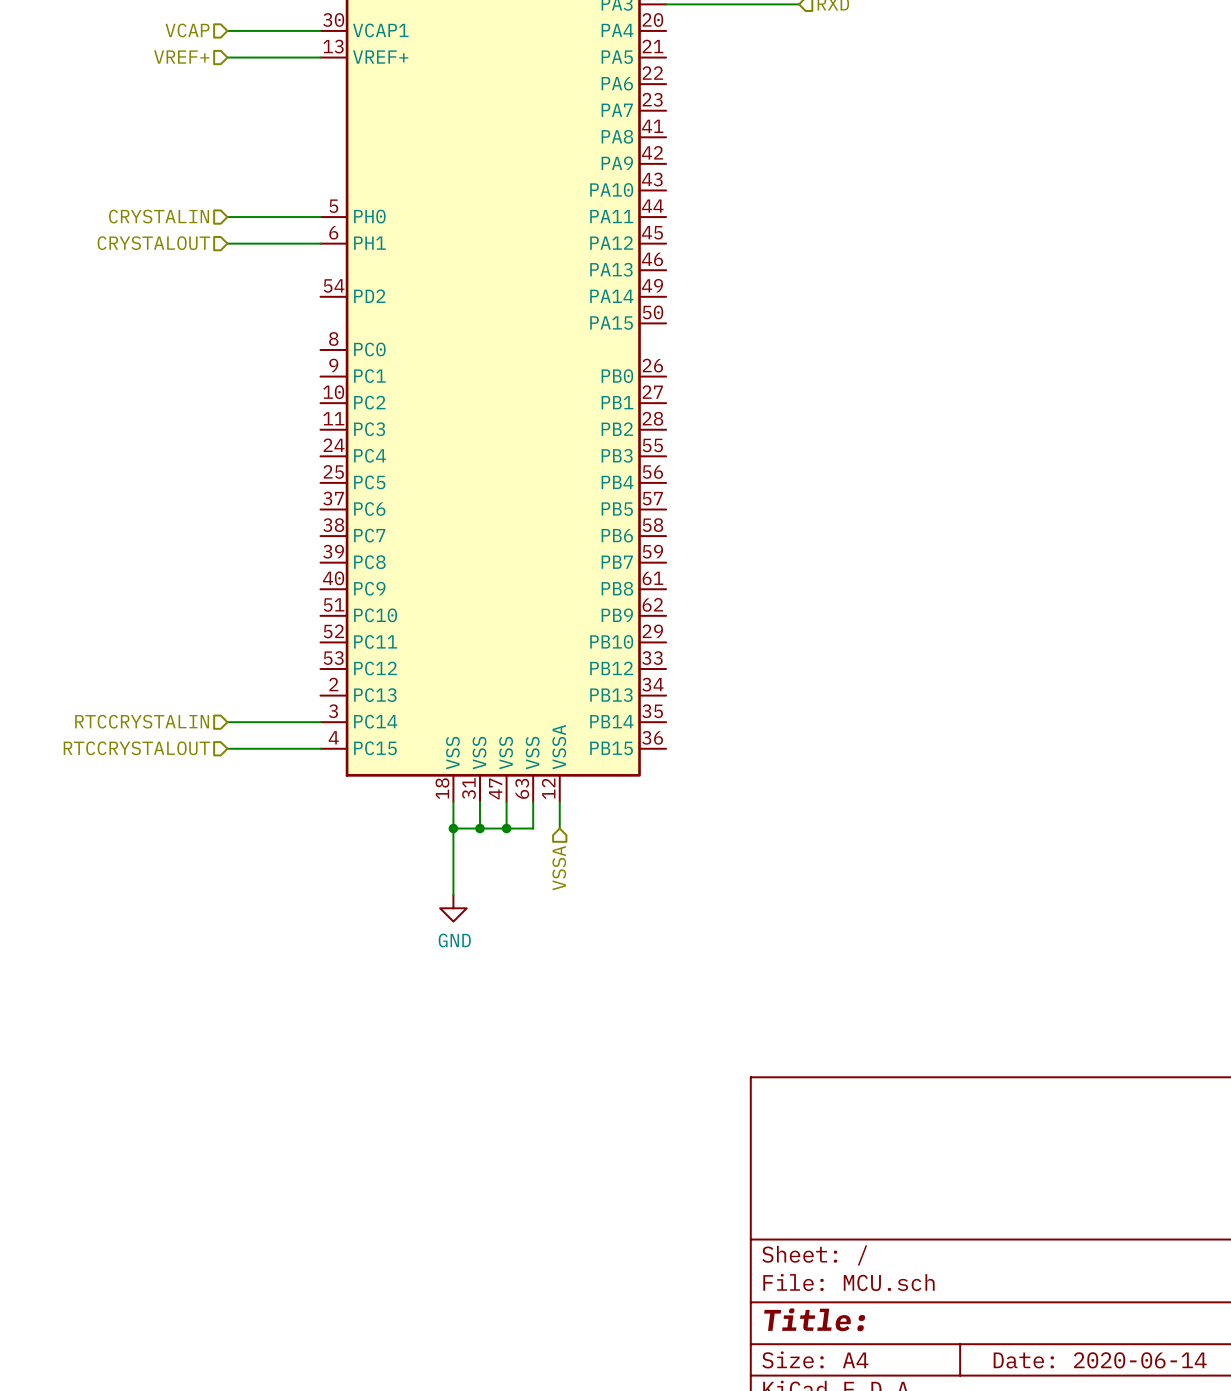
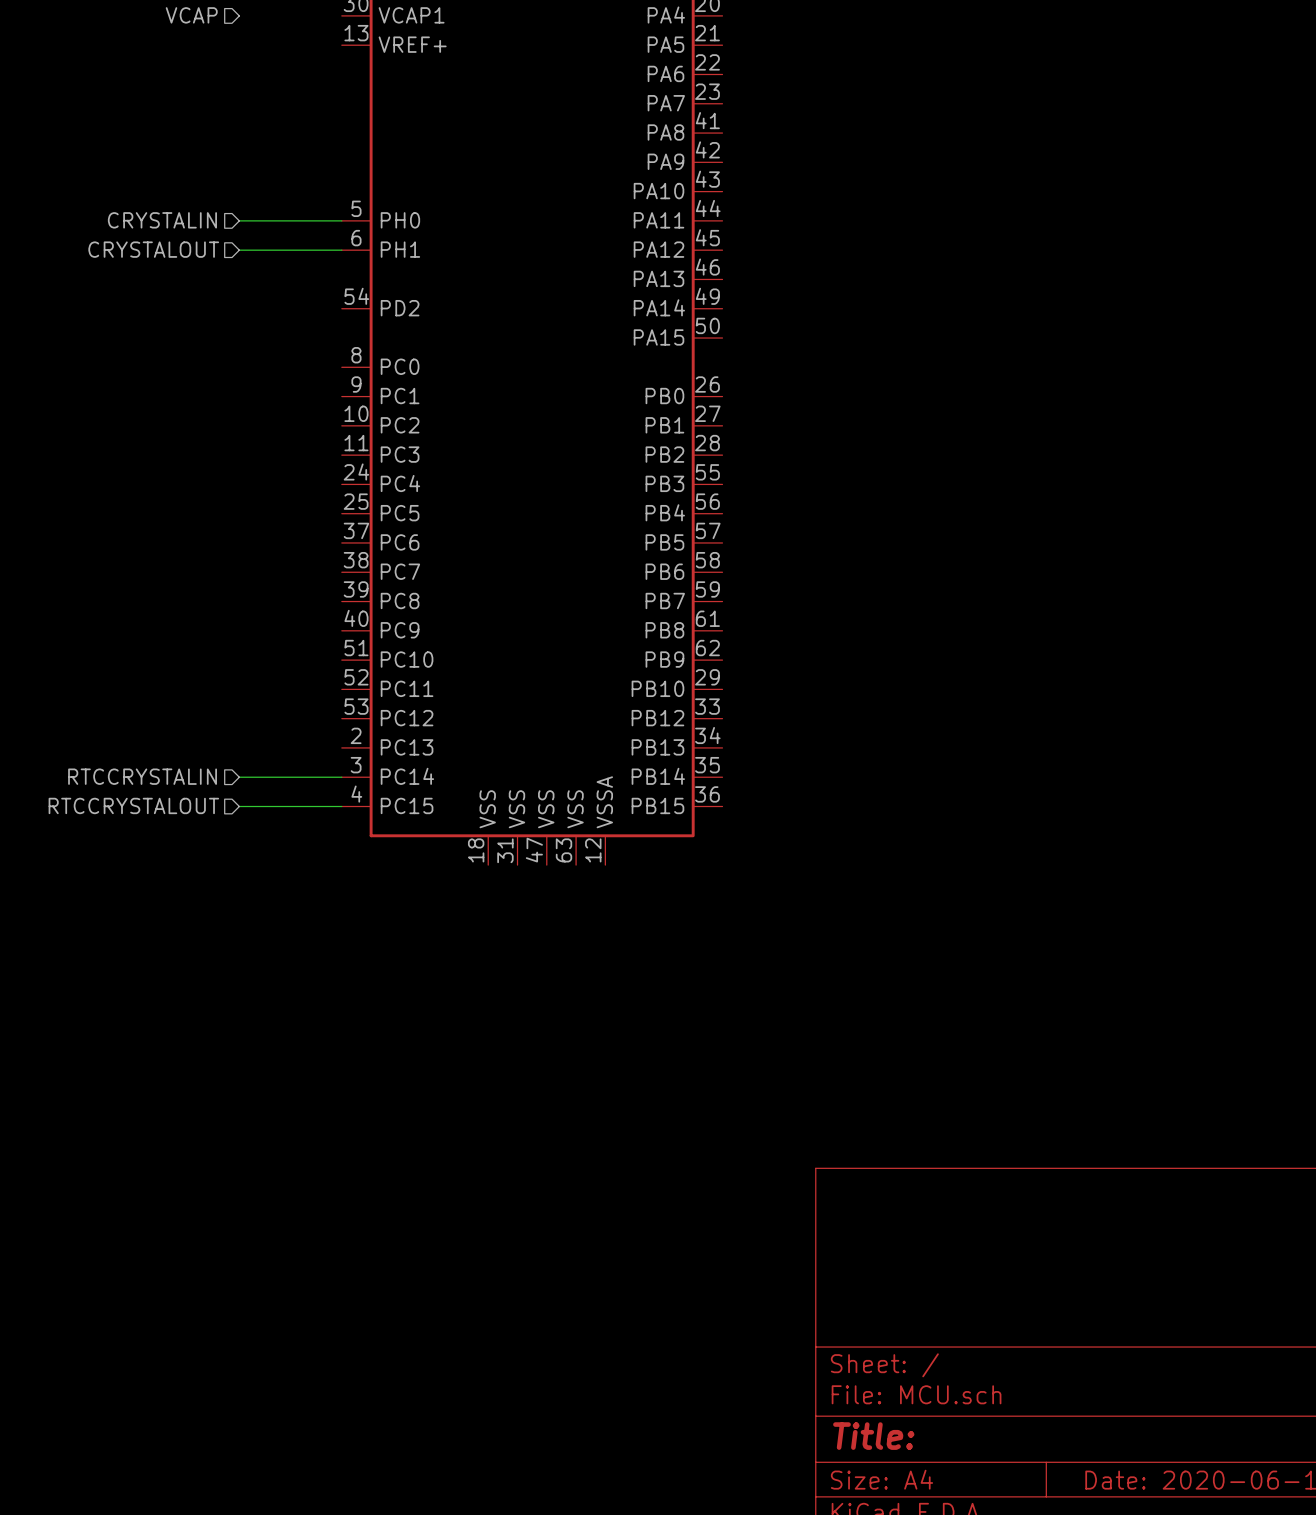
wire: (227, 30) (320, 30) -> none
hierarchical label: VREF+ (181, 57) -> none
wire: (227, 57) (320, 57) -> none
wire: (453, 801) (453, 894) -> none
wire: (480, 801) (480, 828) -> none
wire: (506, 801) (506, 828) -> none
wire: (533, 801) (533, 828) (453, 828) -> none
wire: (559, 801) (559, 828) -> none
junction: (453, 828) -> none
junction: (480, 828) -> none
junction: (506, 828) -> none
hierarchical label: VSSA (559, 868) -> none
power symbol: GND (453, 908) -> none

